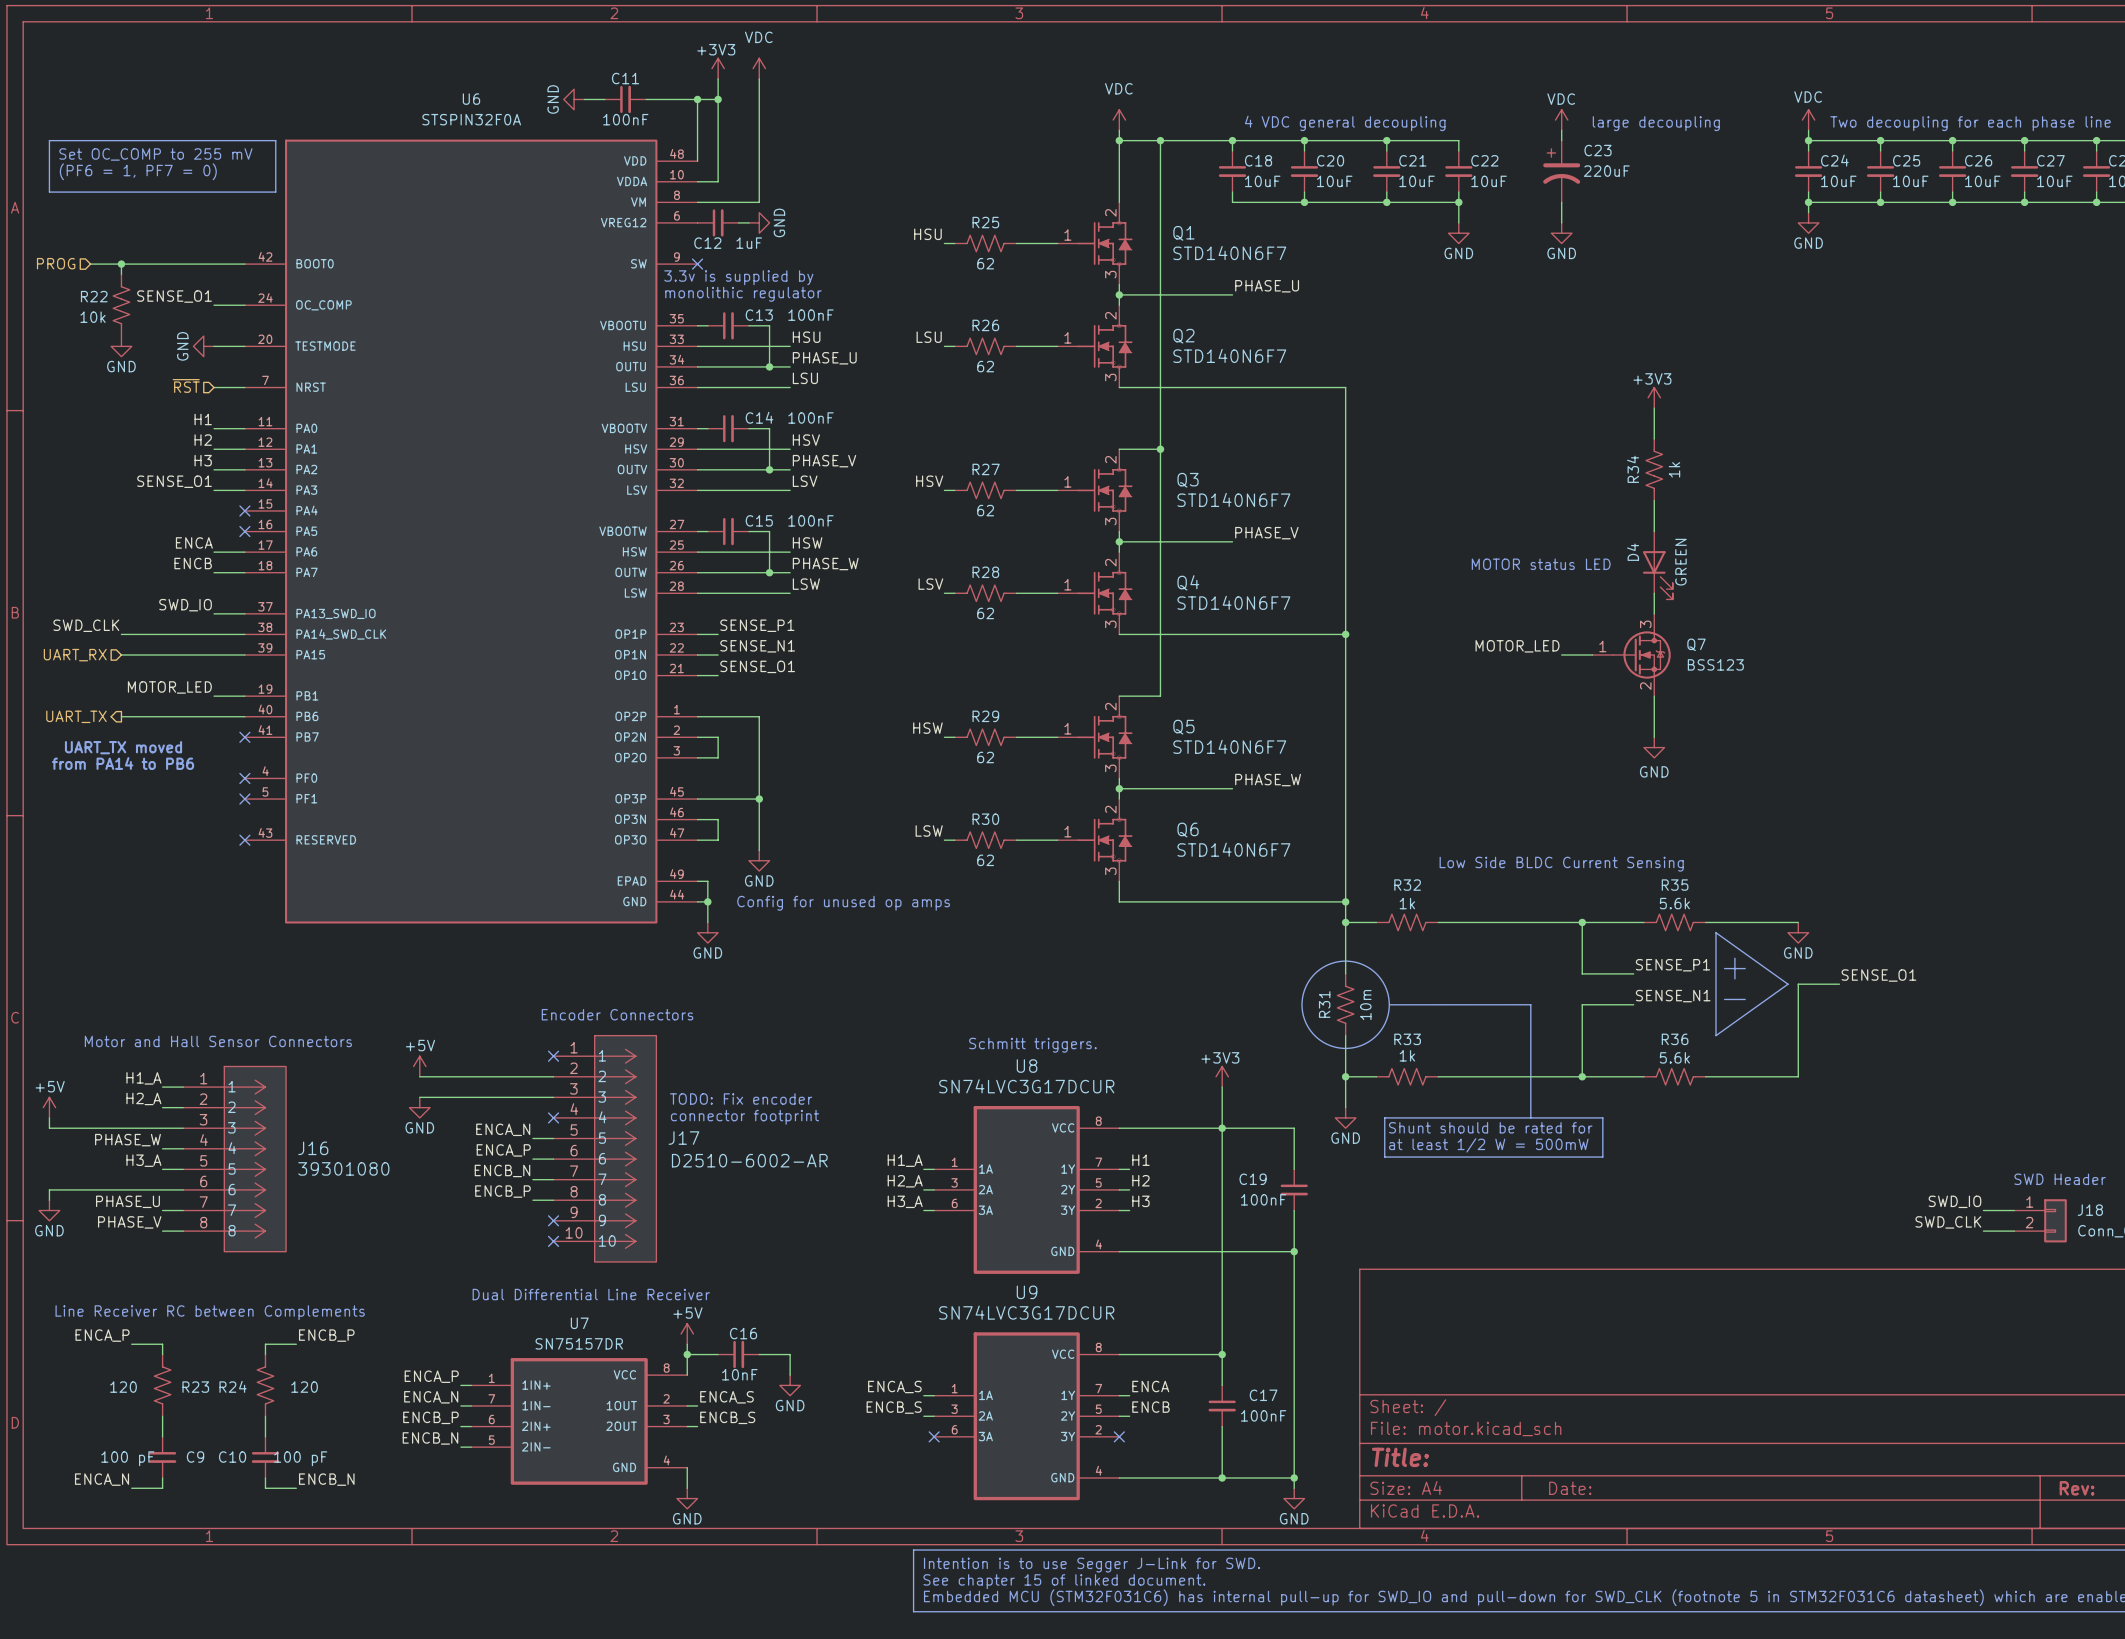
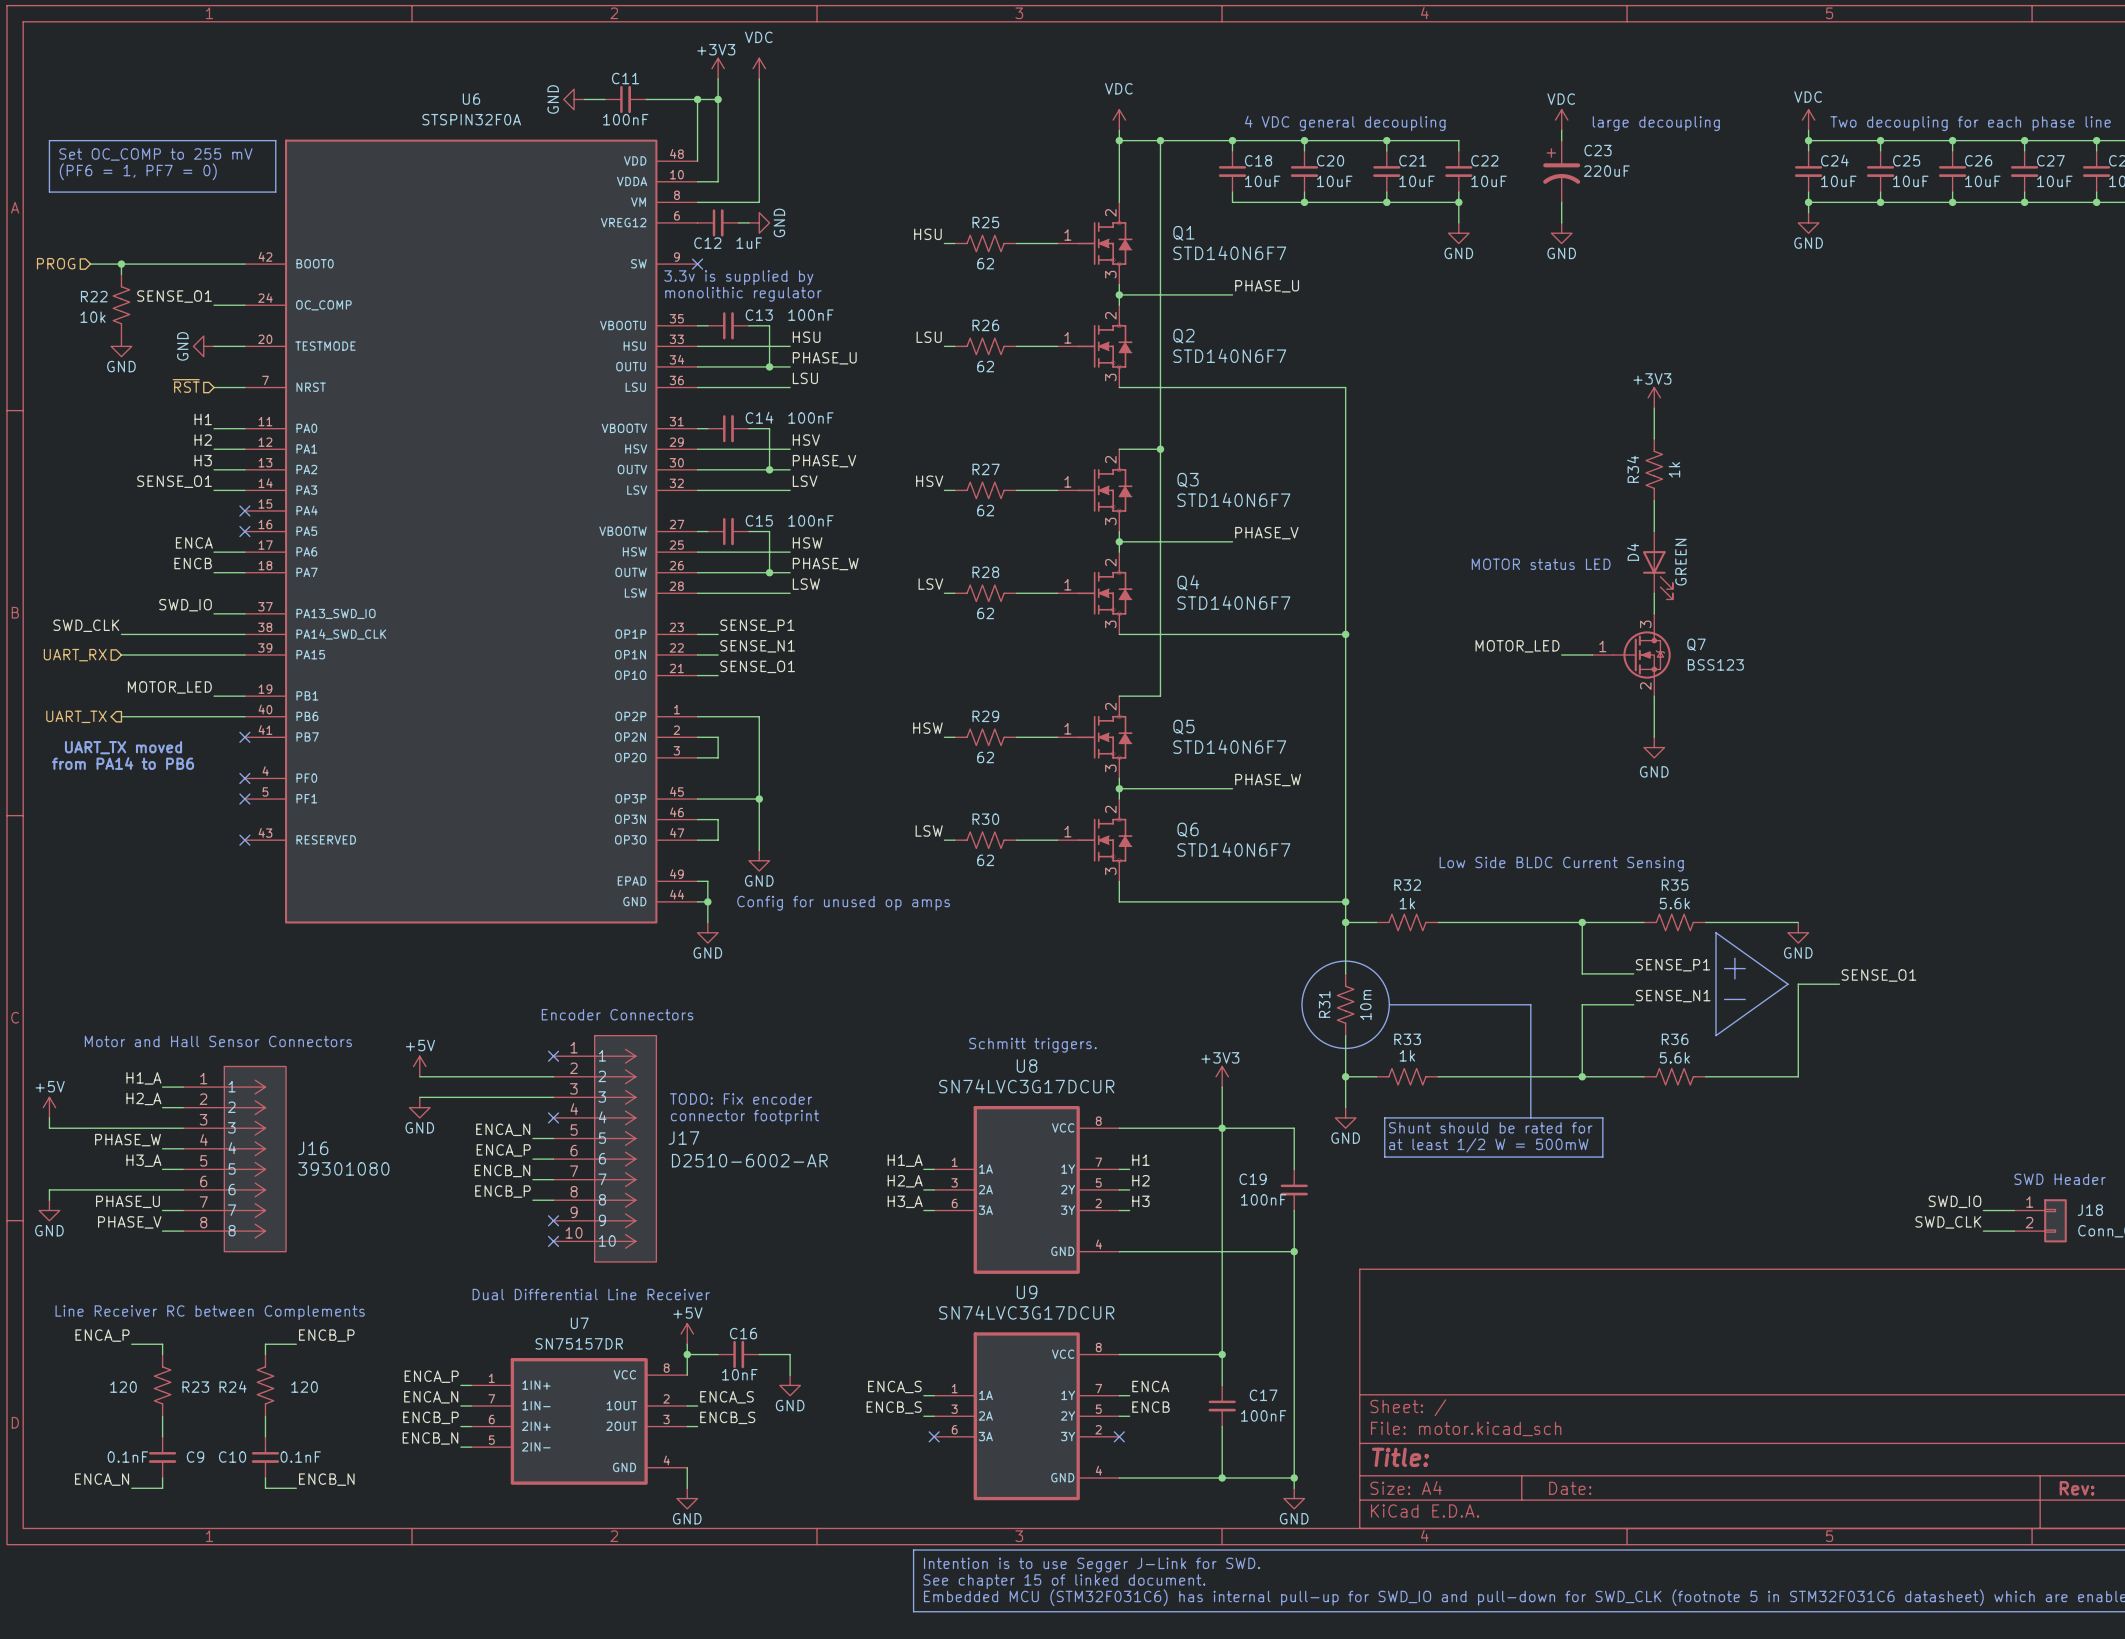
C9 value: 100 pF (127, 1458) -> 0.1nF (127, 1457)
C10 value: 100 pF (300, 1458) -> 0.1nF (300, 1457)

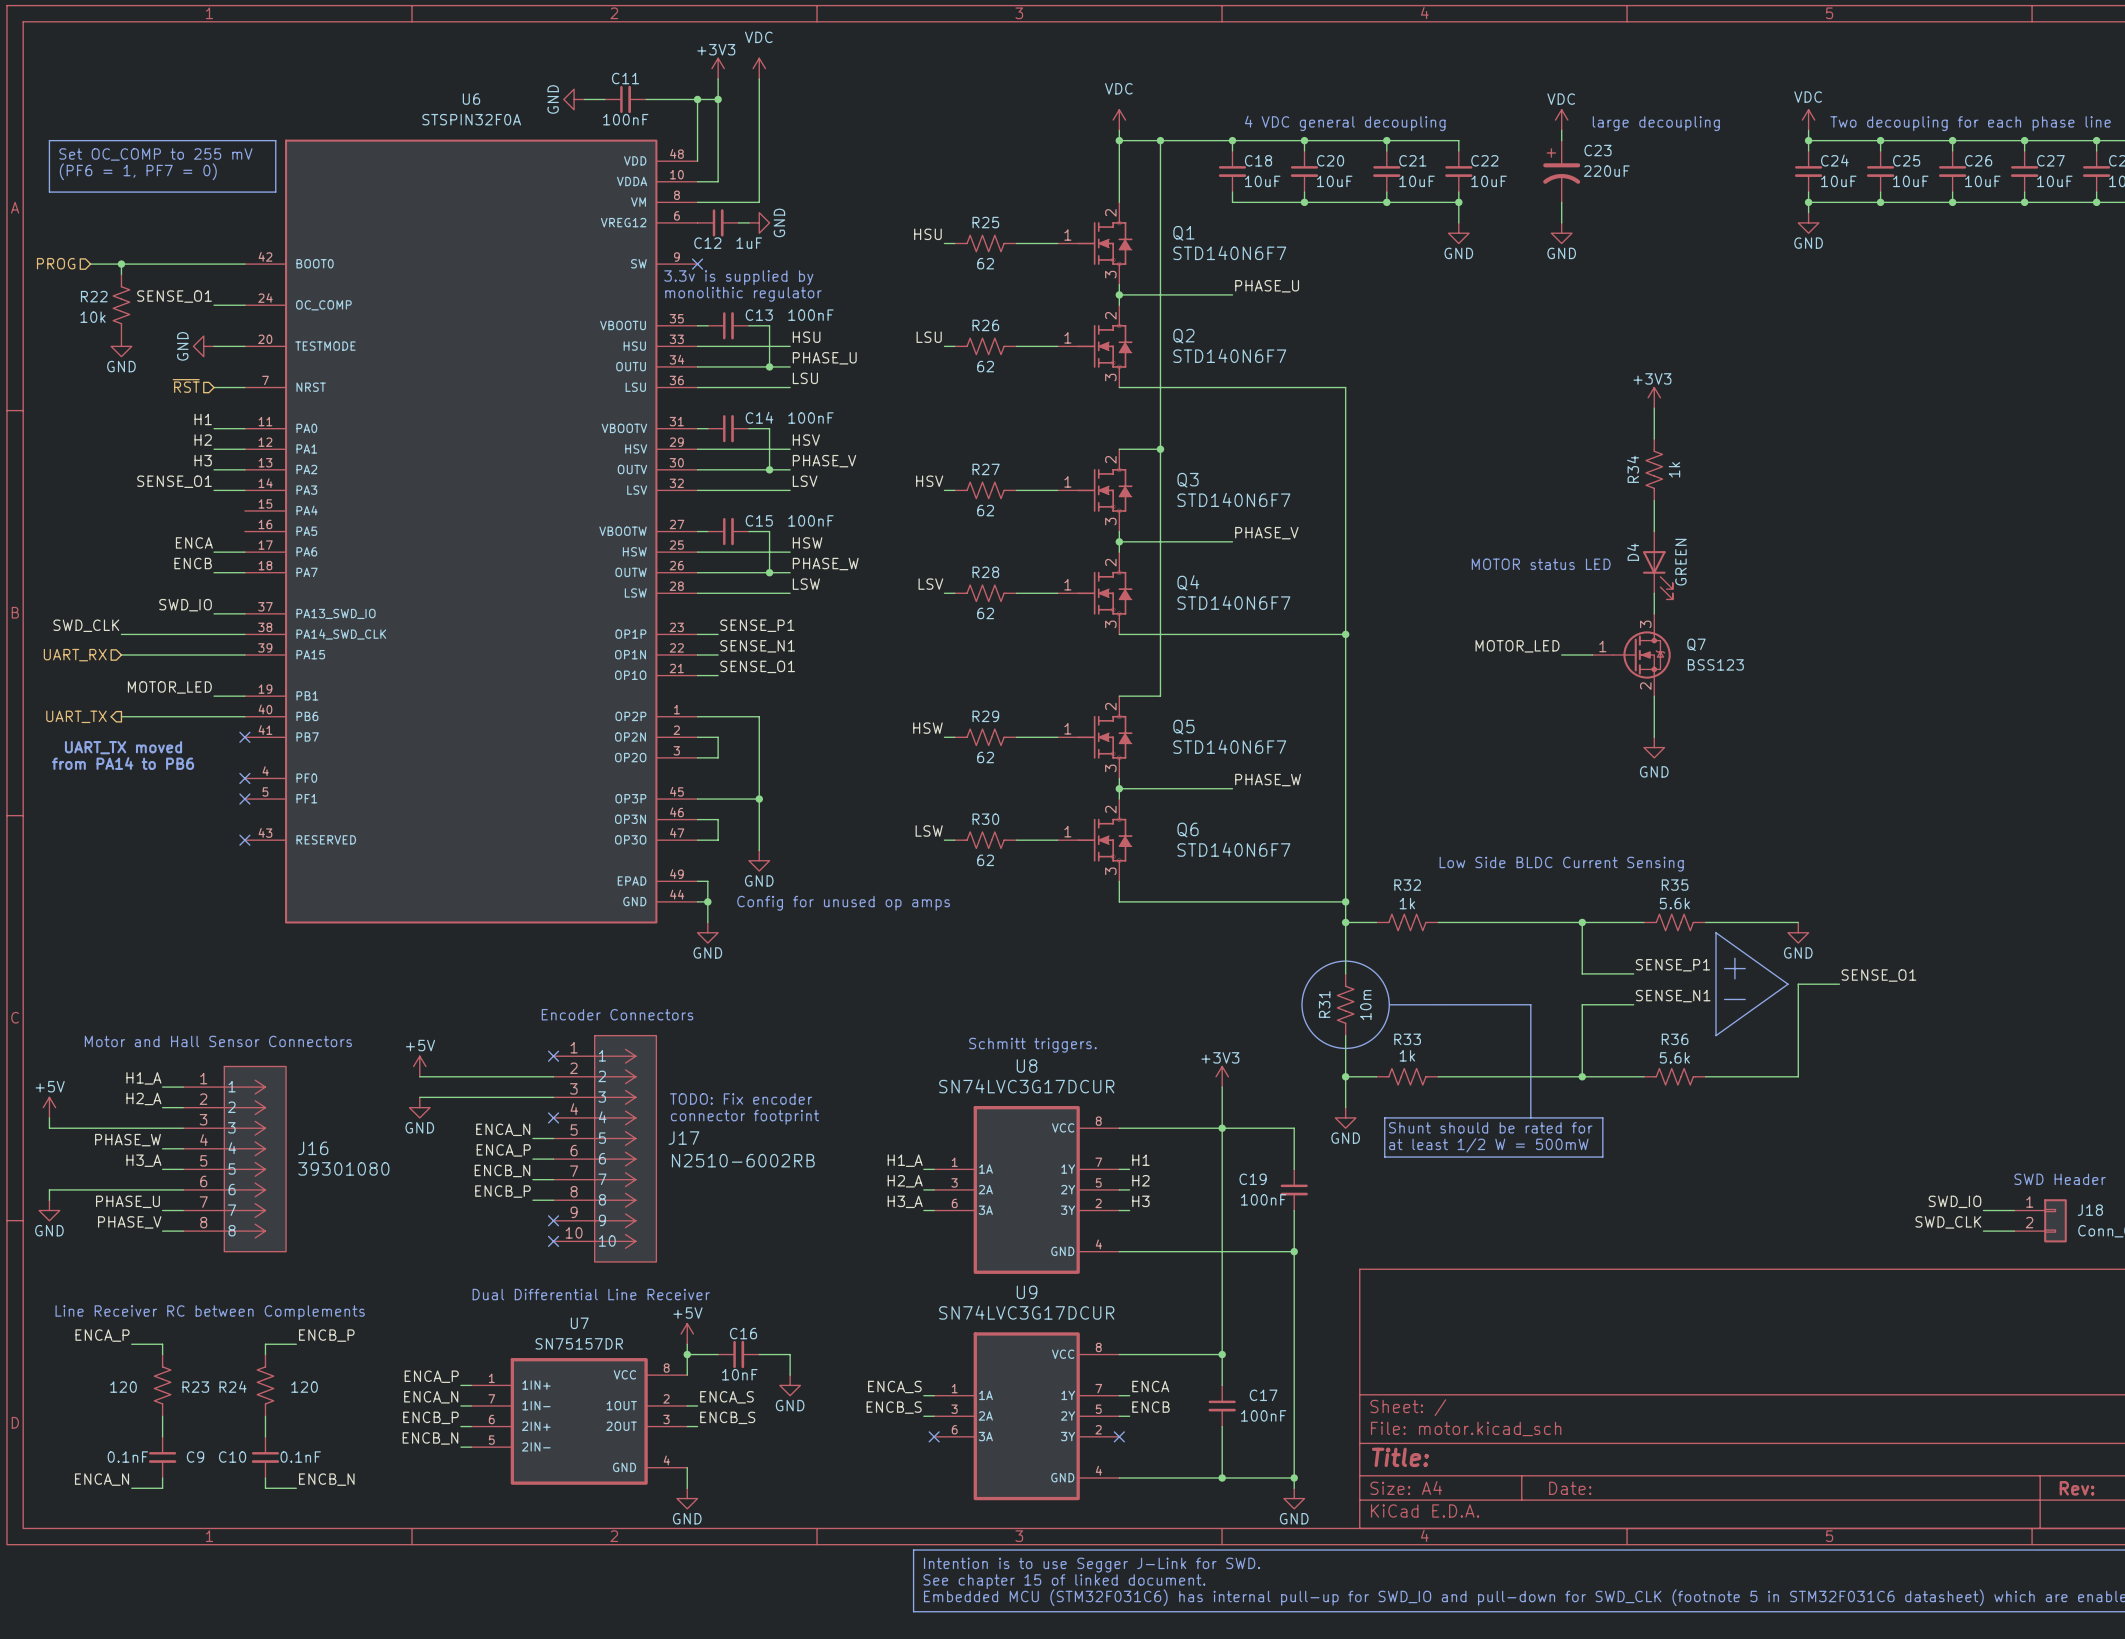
no-connect mark: (244, 510) -> none
no-connect mark: (244, 531) -> none
J17 value: D2510-6002-AR (749, 1160) -> N2510-6002RB (743, 1160)

